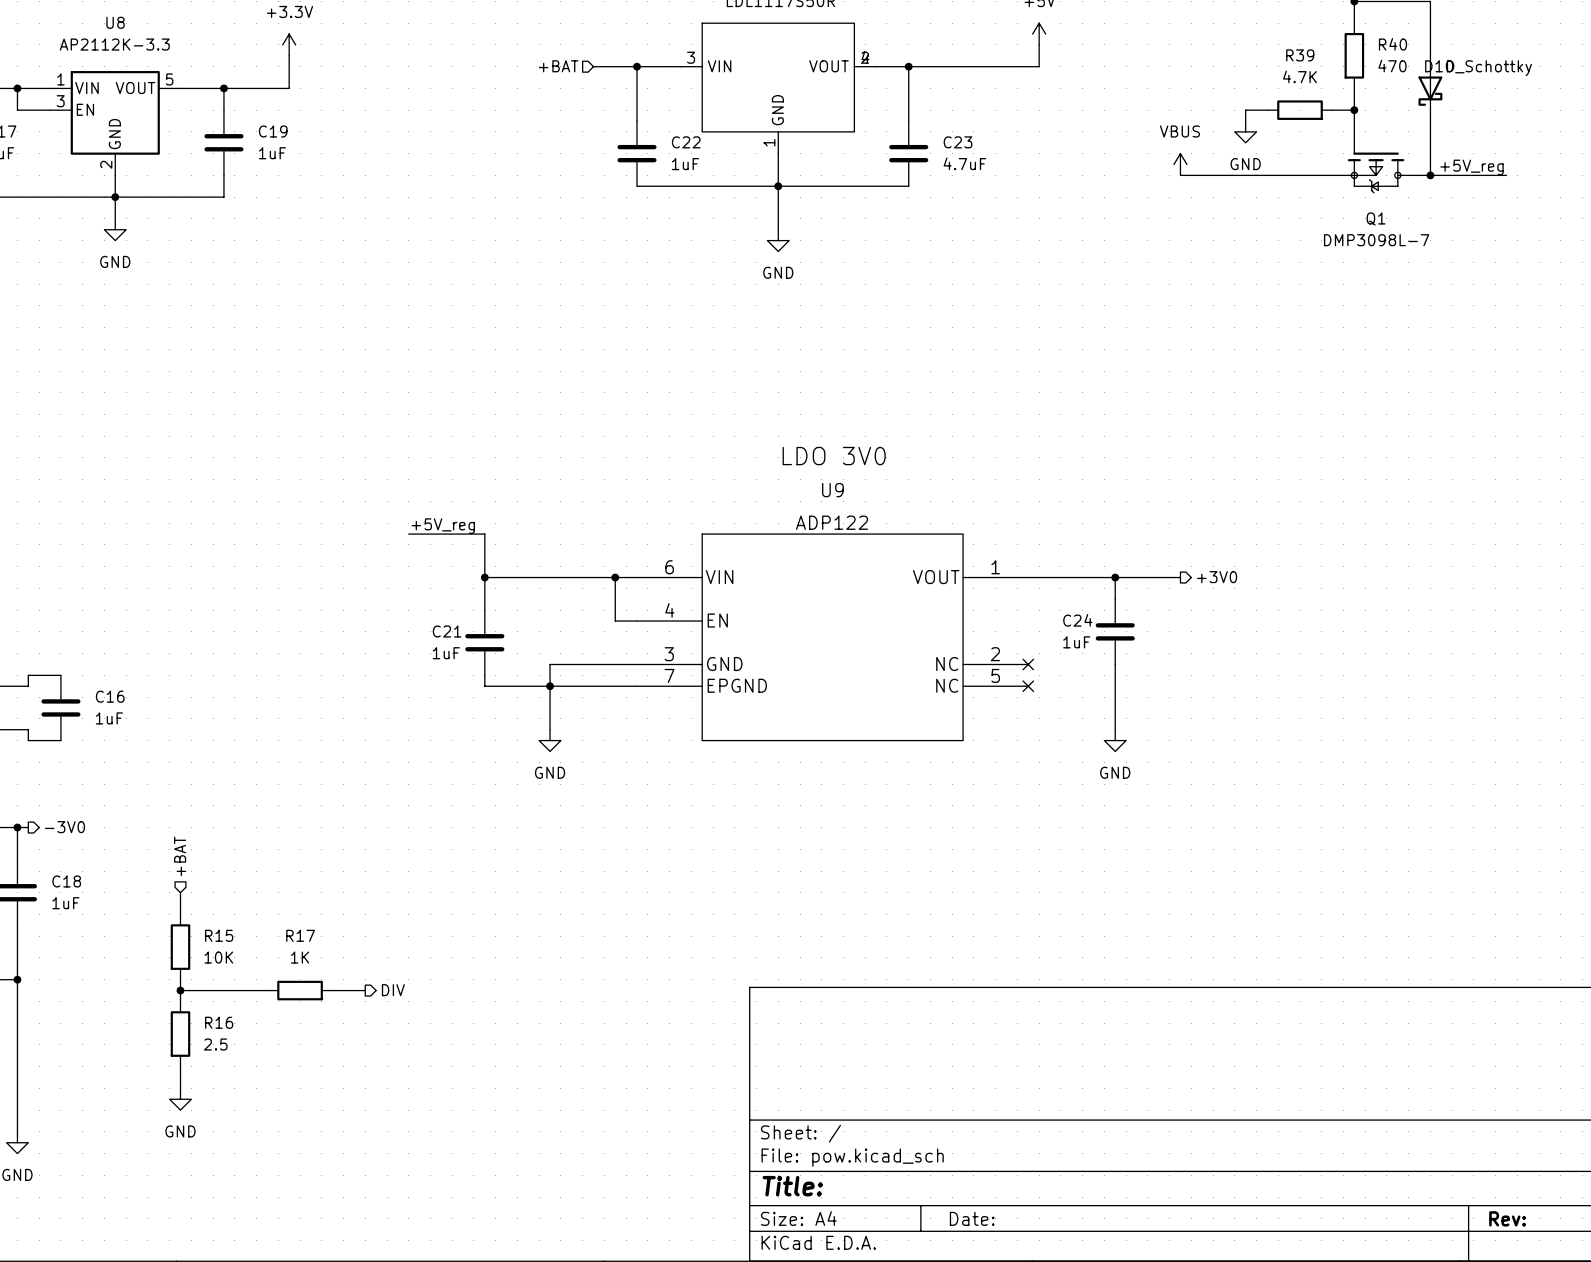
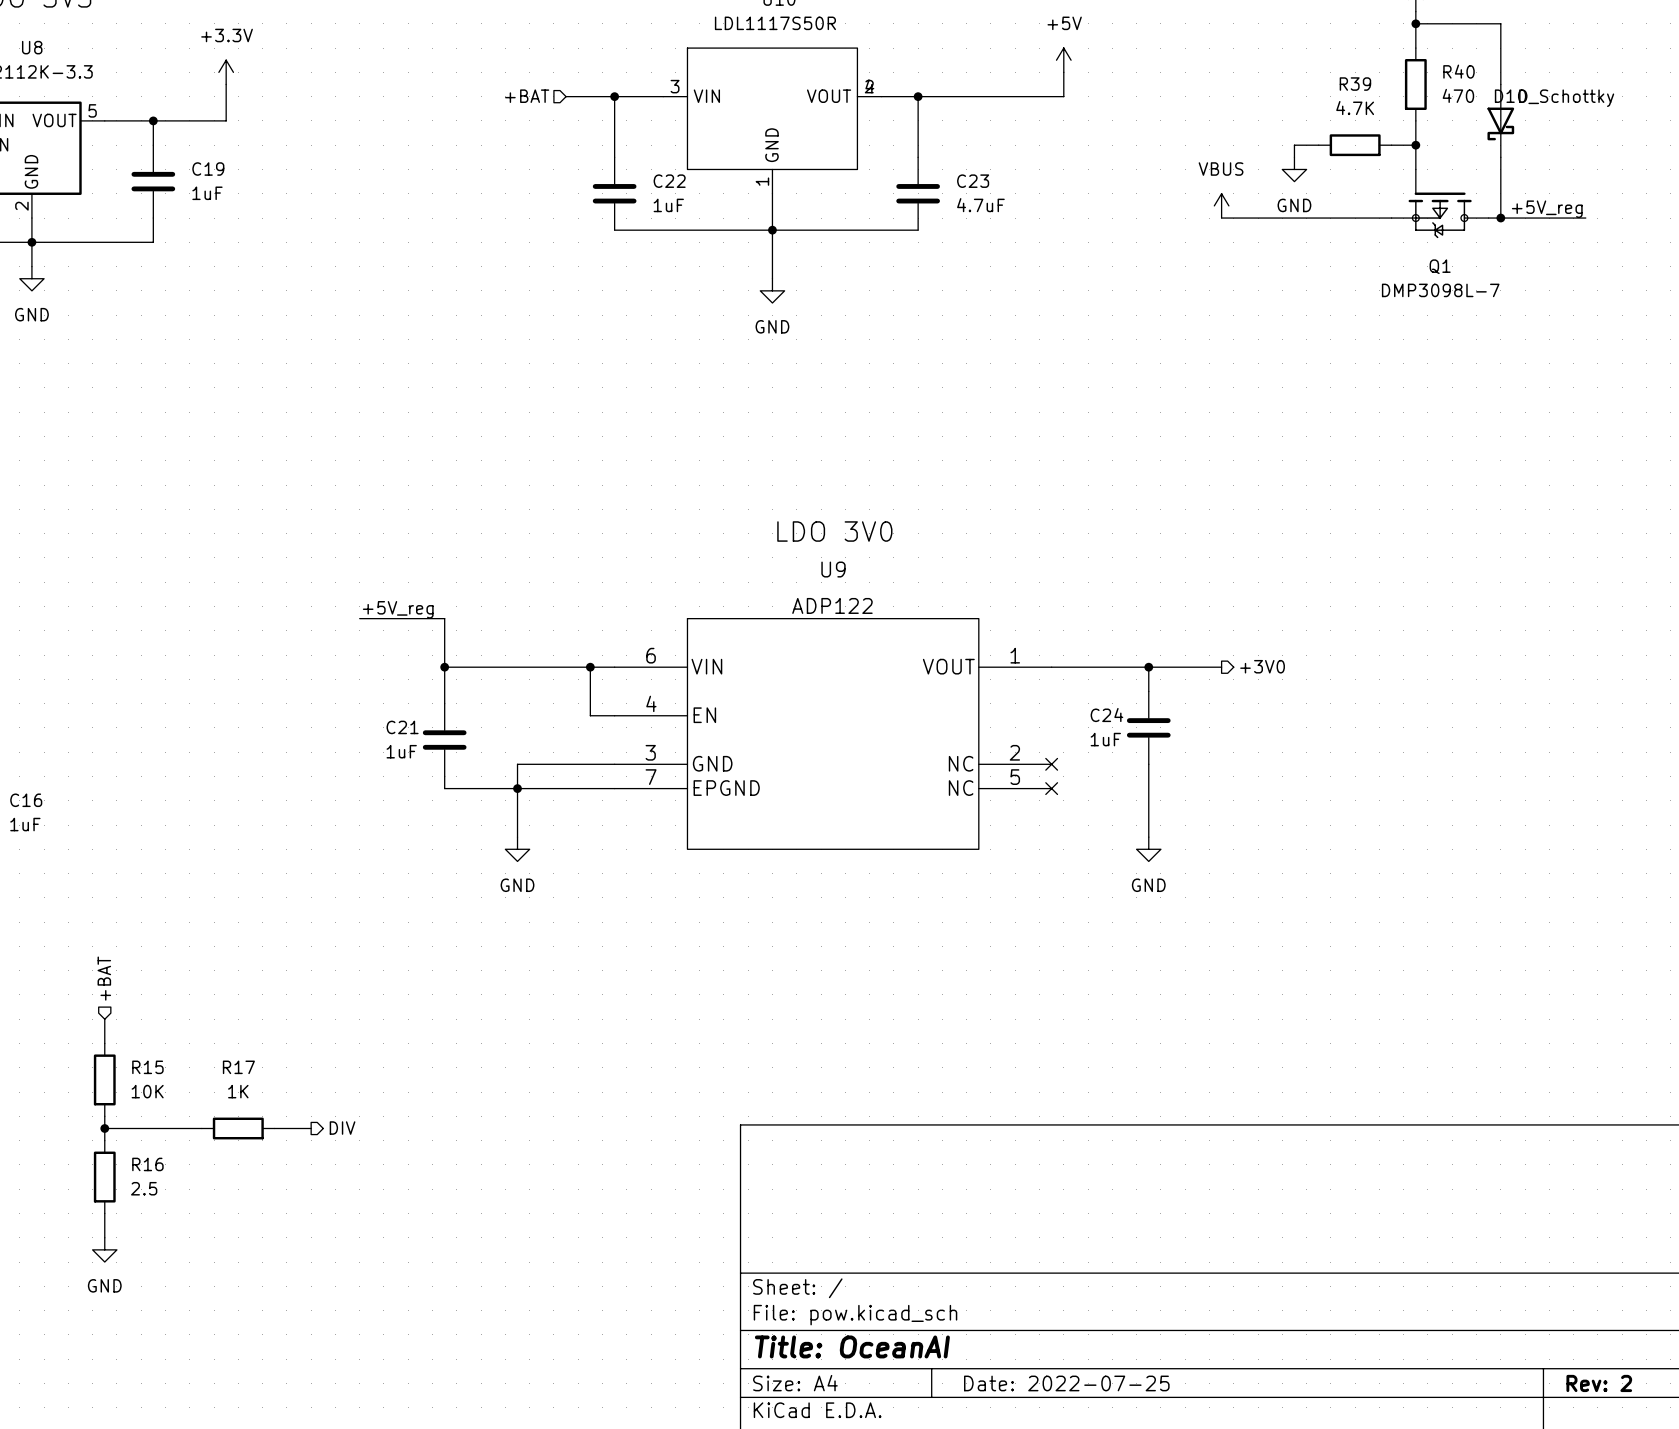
title block: Title: (792, 1186) -> Title: OceanAI (852, 1346)
title block: Date: (972, 1218) -> Date: 2022-07-25 (1066, 1383)
title block: Rev: (1507, 1218) -> Rev: 2 (1599, 1383)

